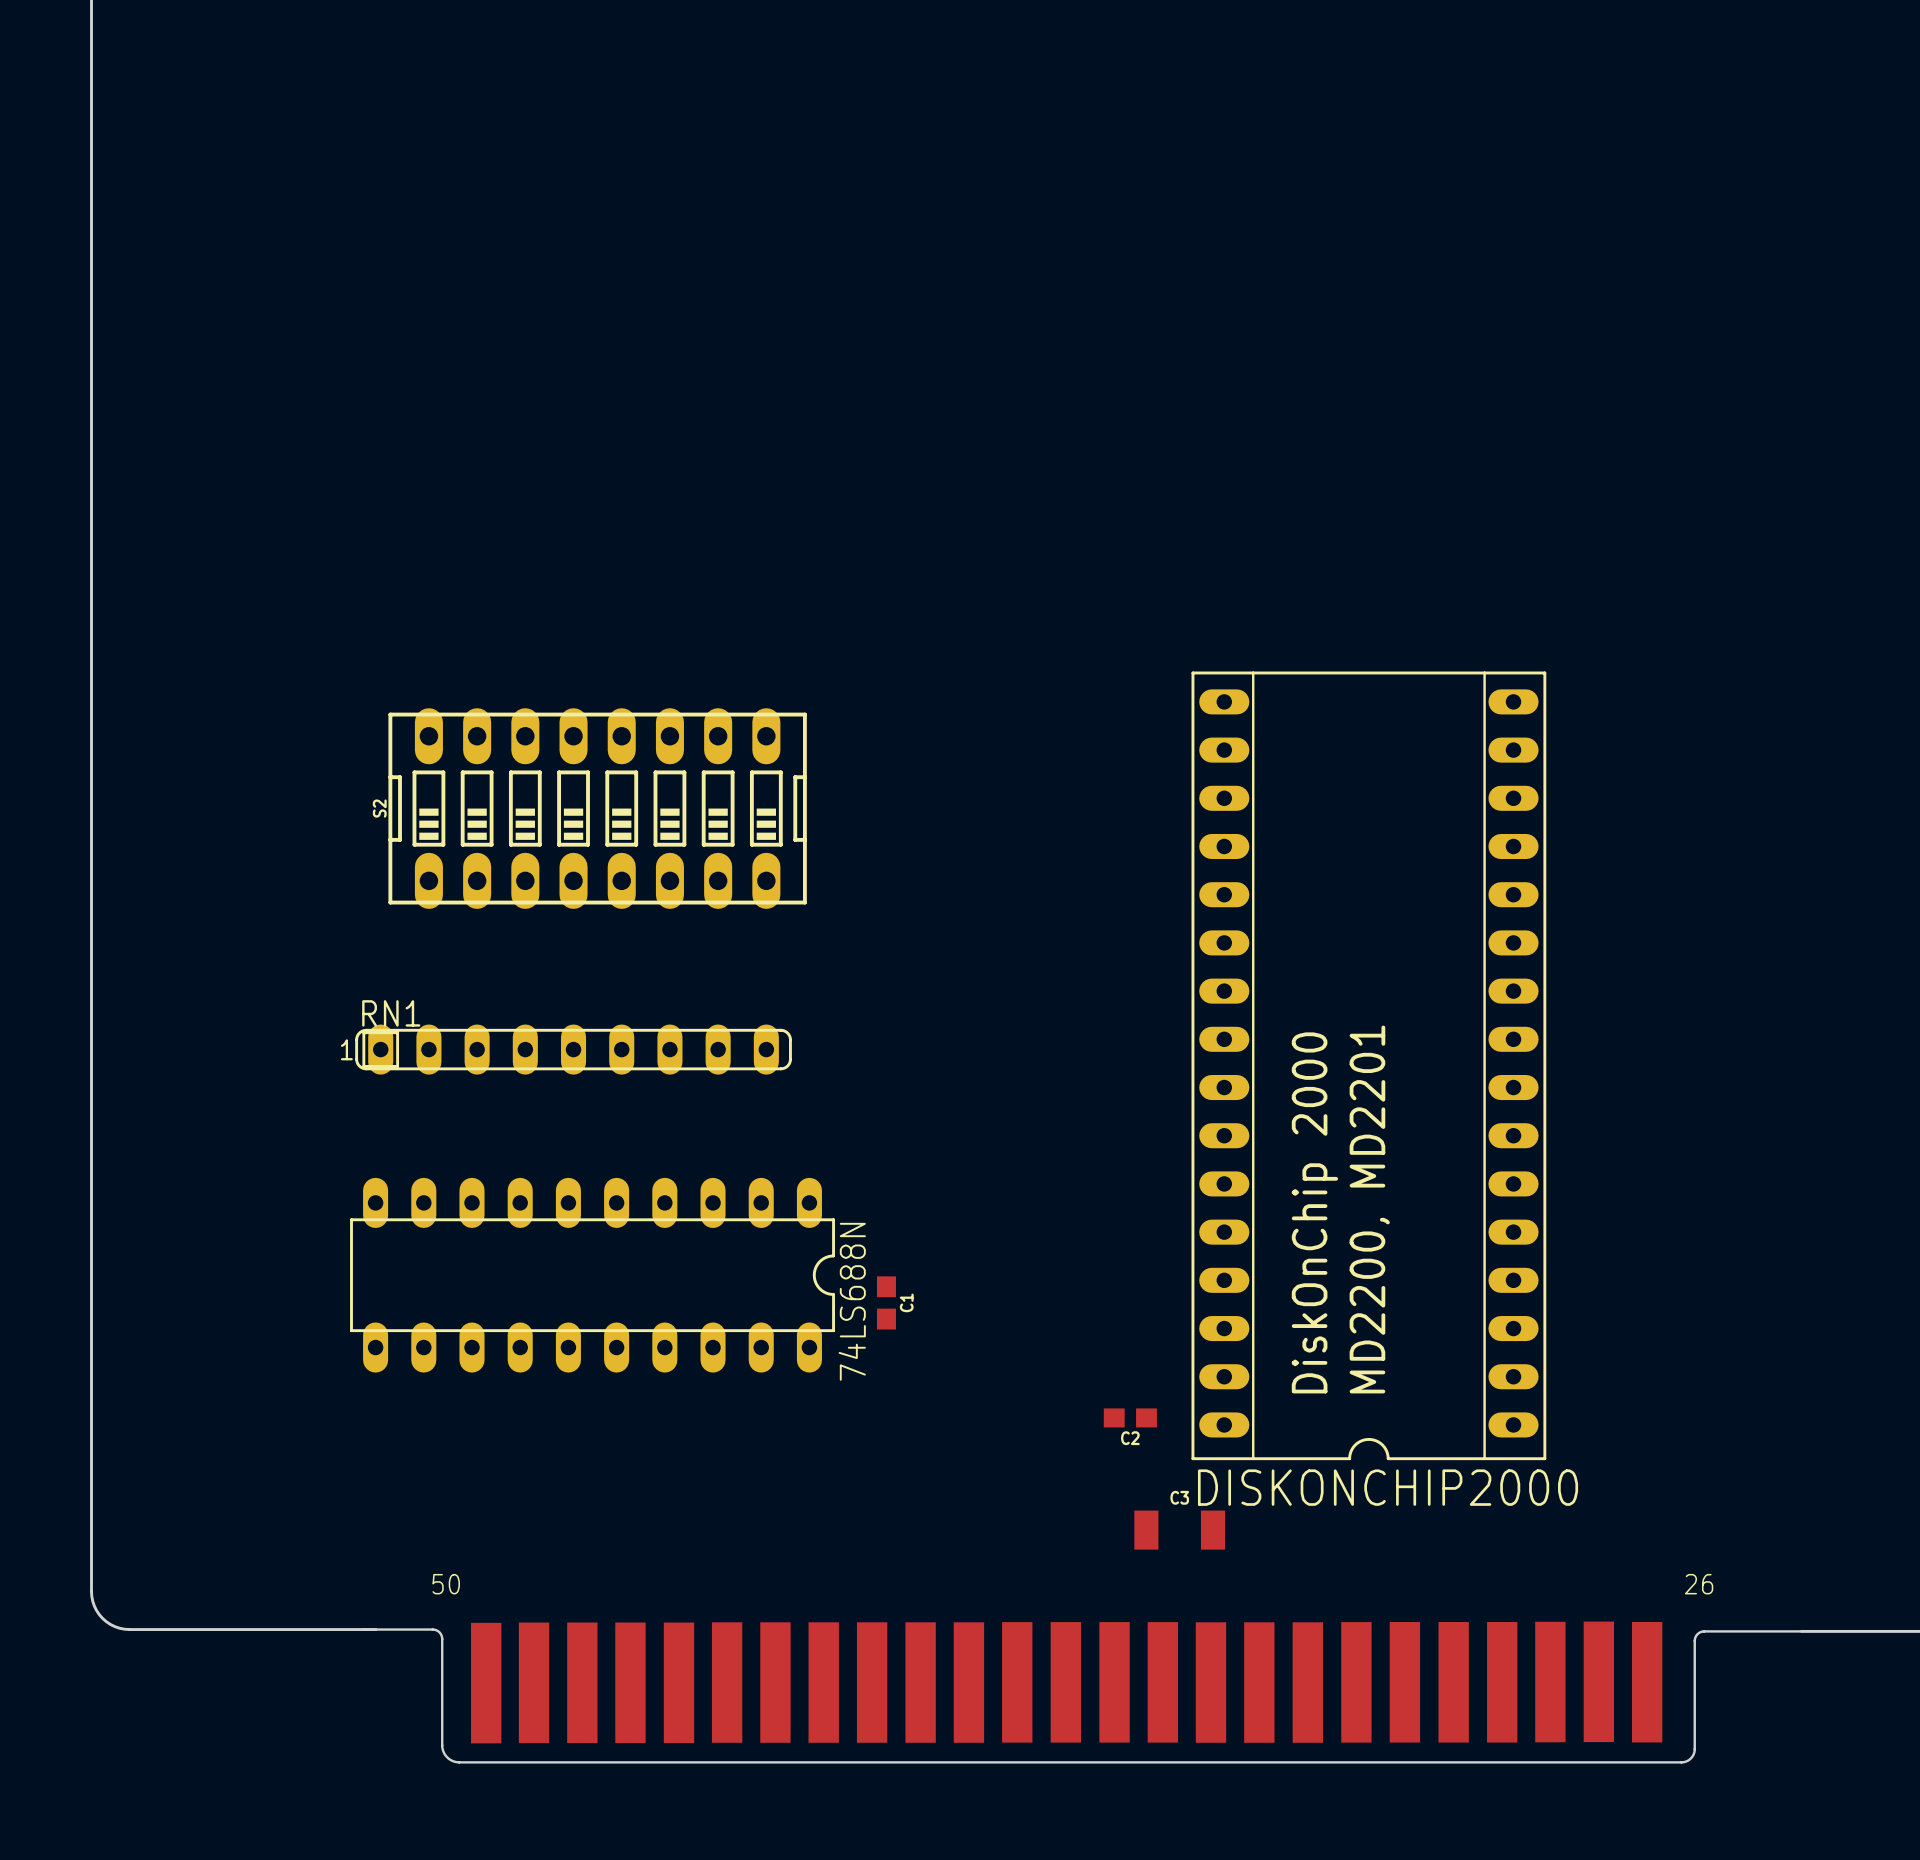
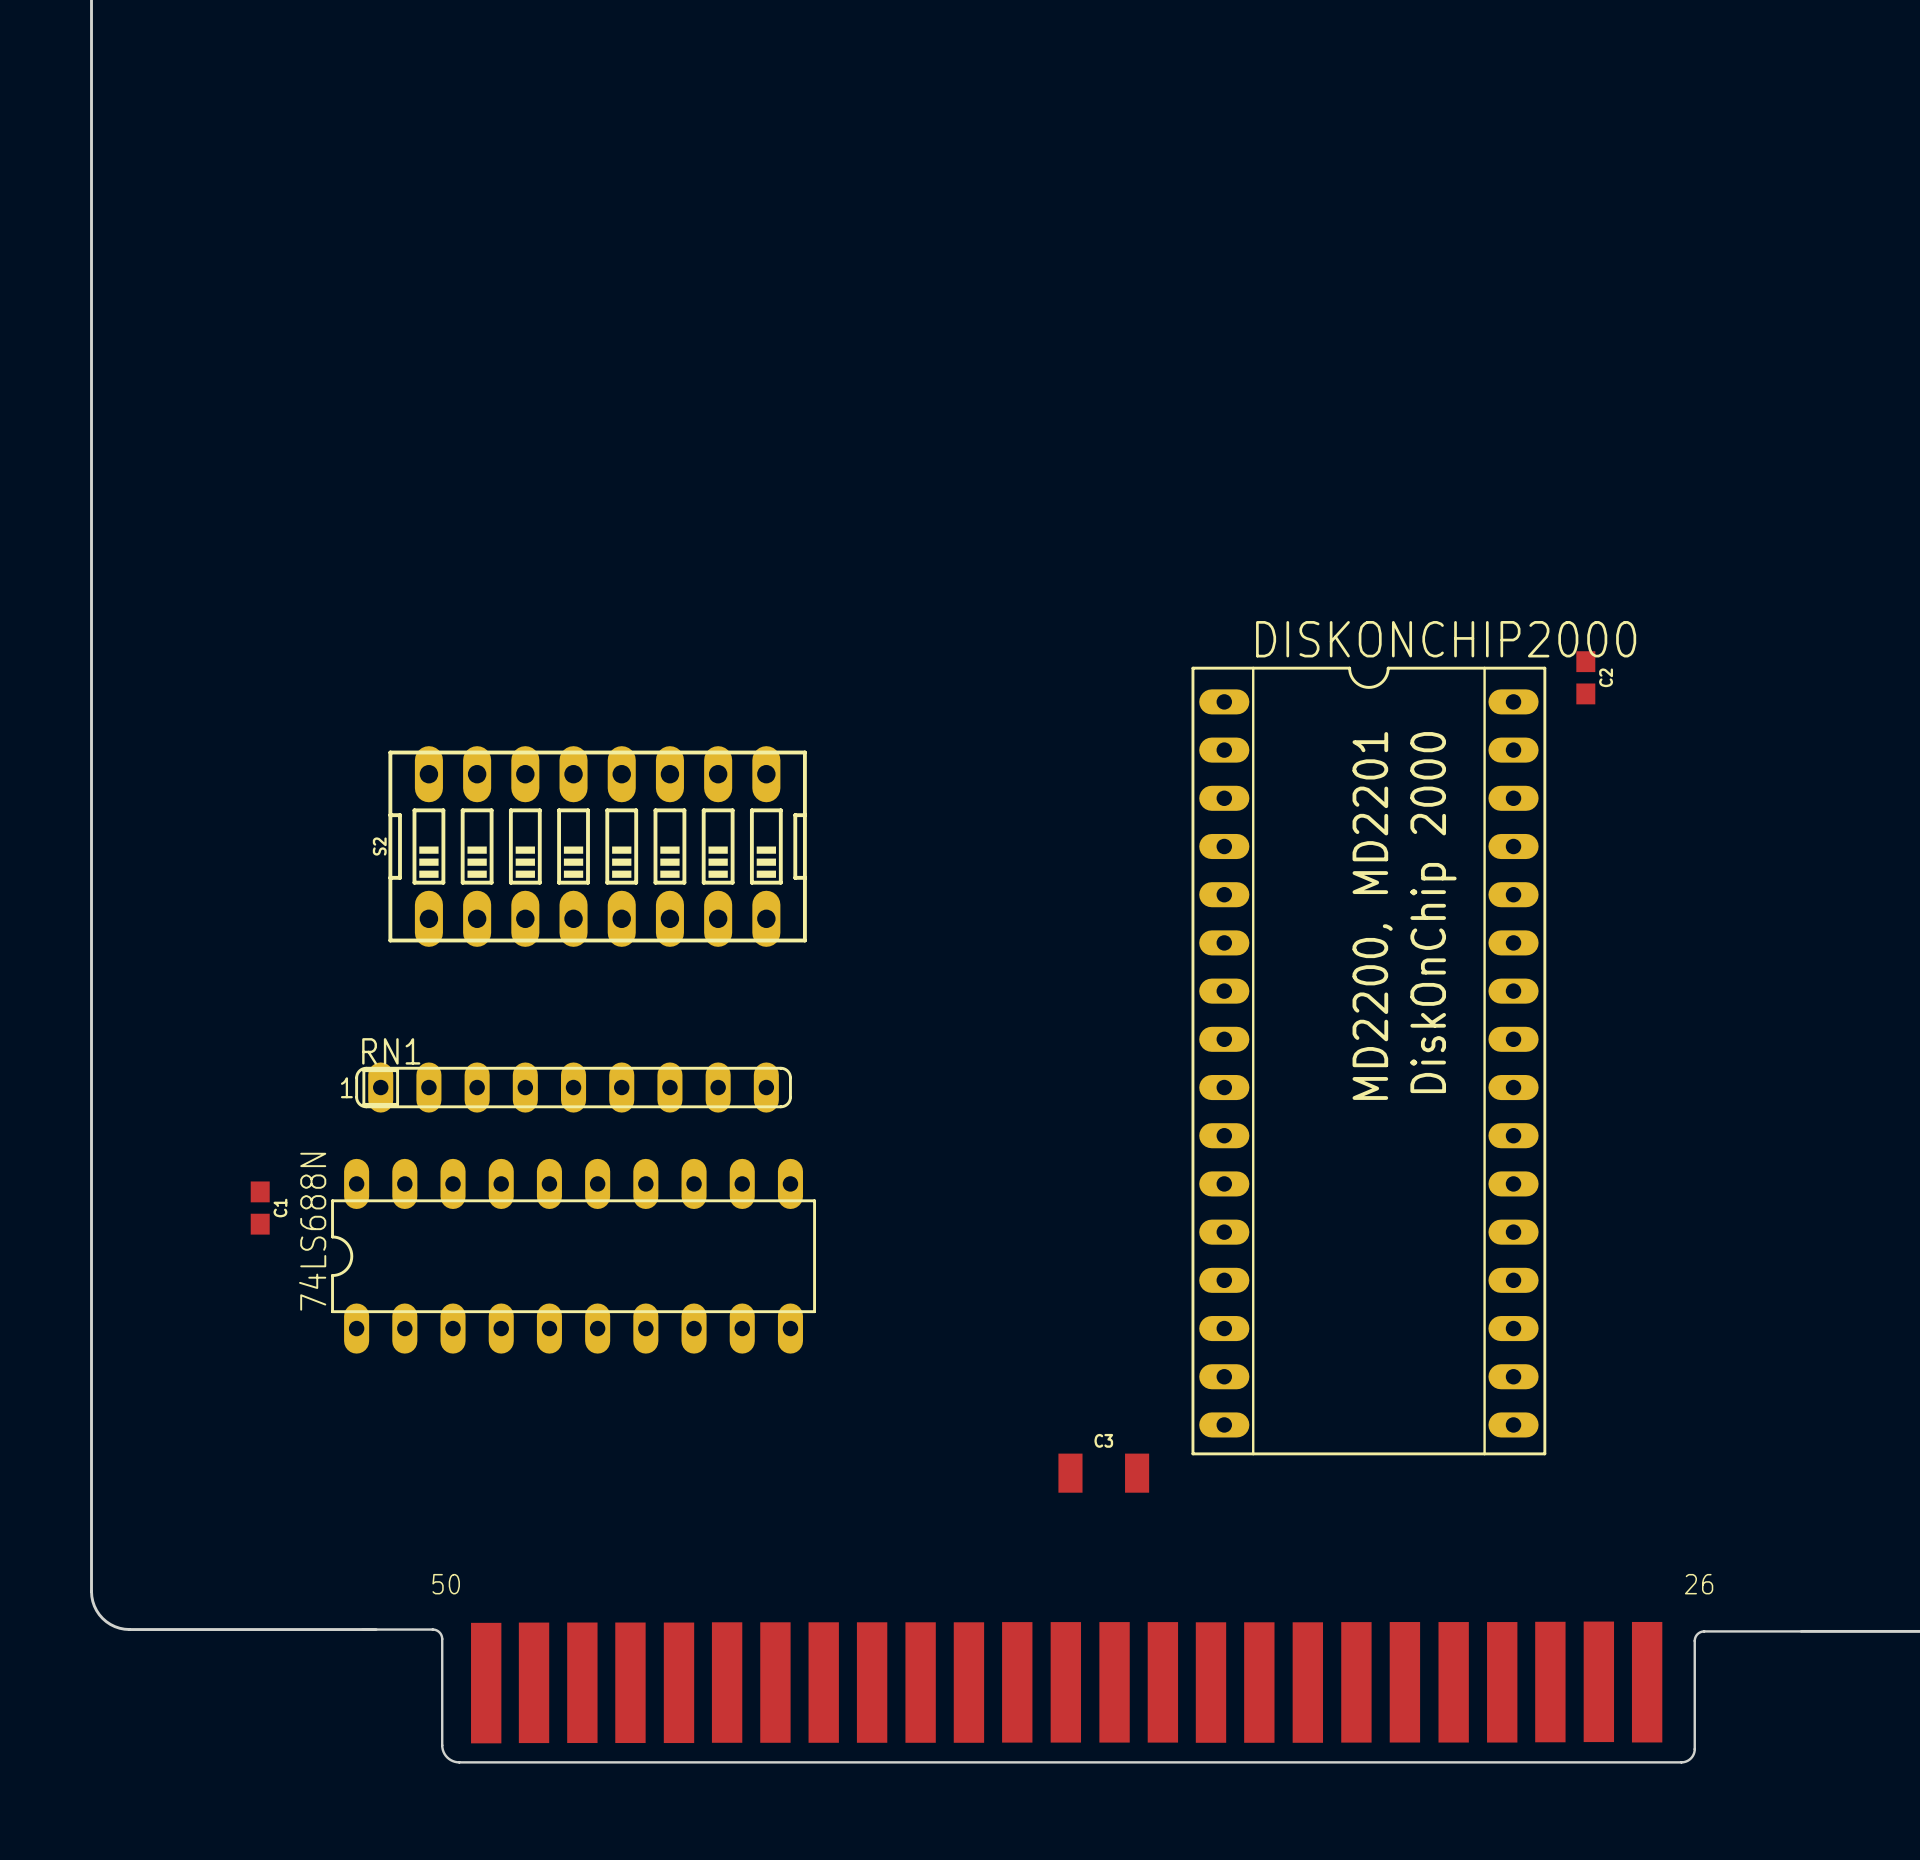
DISKONCHIP2000 footprint: [1191, 671, 1547, 1461] -> [1191, 666, 1547, 1456]
S2 position: (597, 808) -> (597, 846)
RN1 position: (573, 1049) -> (573, 1087)
74LS688N rotation: 0° (592, 1275) -> 180° (573, 1256)
C1 position: (886, 1302) -> (260, 1208)
C2 rotation: 0° (1130, 1417) -> 90° clockwise (1585, 677)
C2 position: (1130, 1417) -> (1585, 677)
DISKONCHIP2000 name position: DISKONCHIP2000 (1388, 1487) -> DISKONCHIP2000 (1446, 639)
C3 position: (1179, 1530) -> (1103, 1473)

